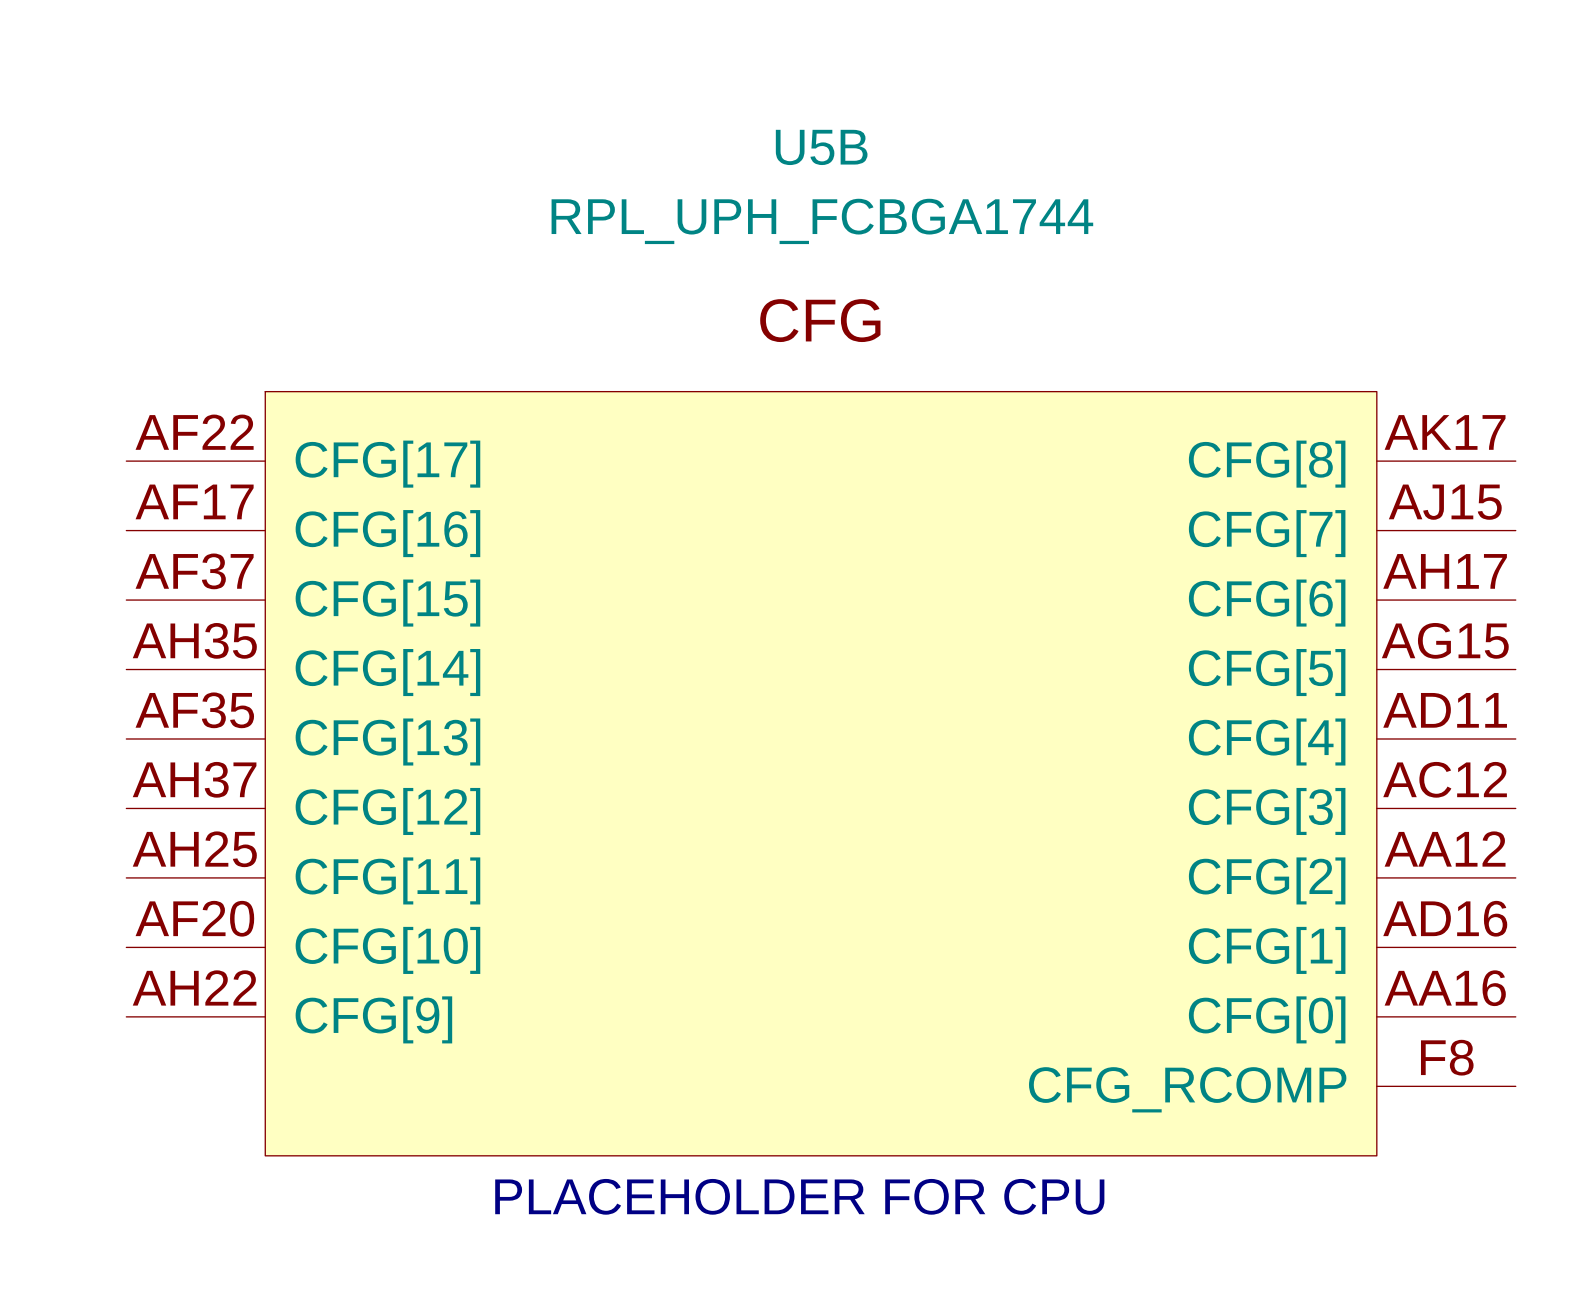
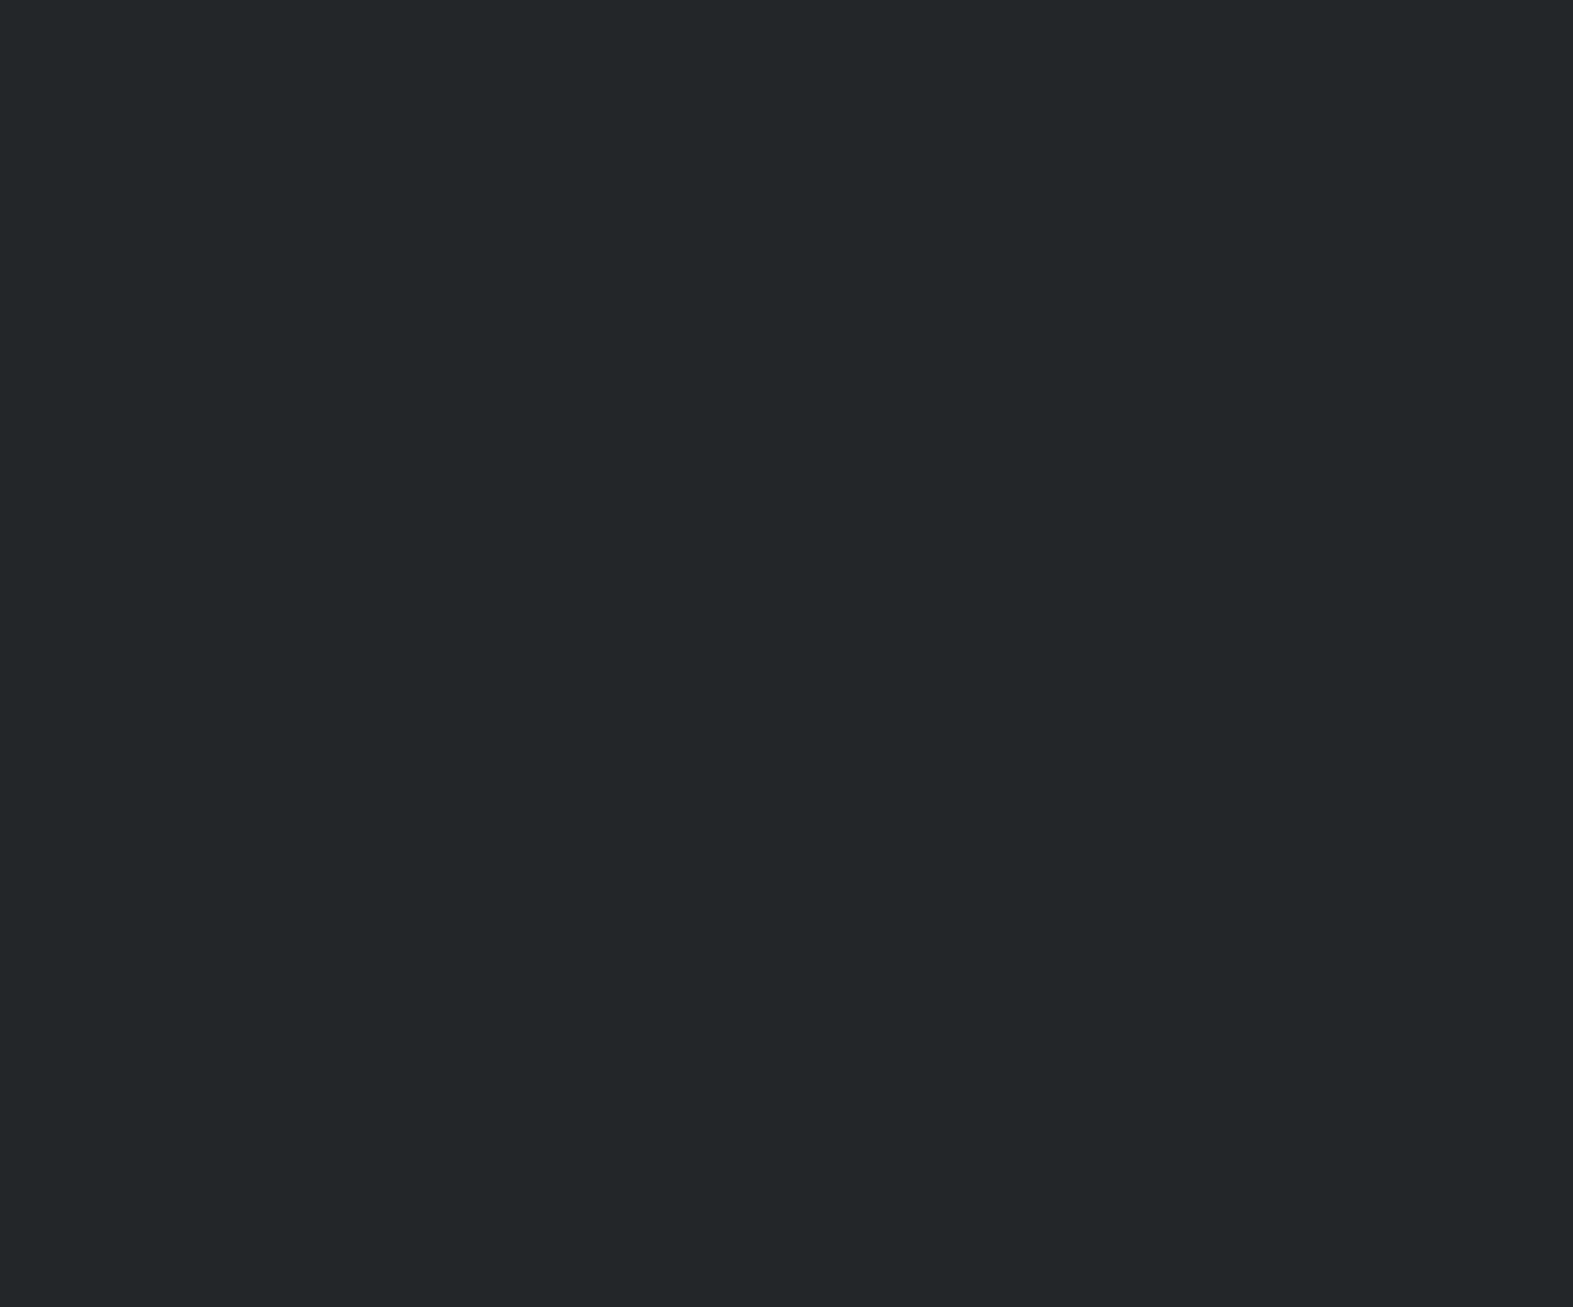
U5B: RPL_UPH_FCBGA1744 (821, 773) -> none
text: PLACEHOLDER FOR CPU (799, 1196) -> none

